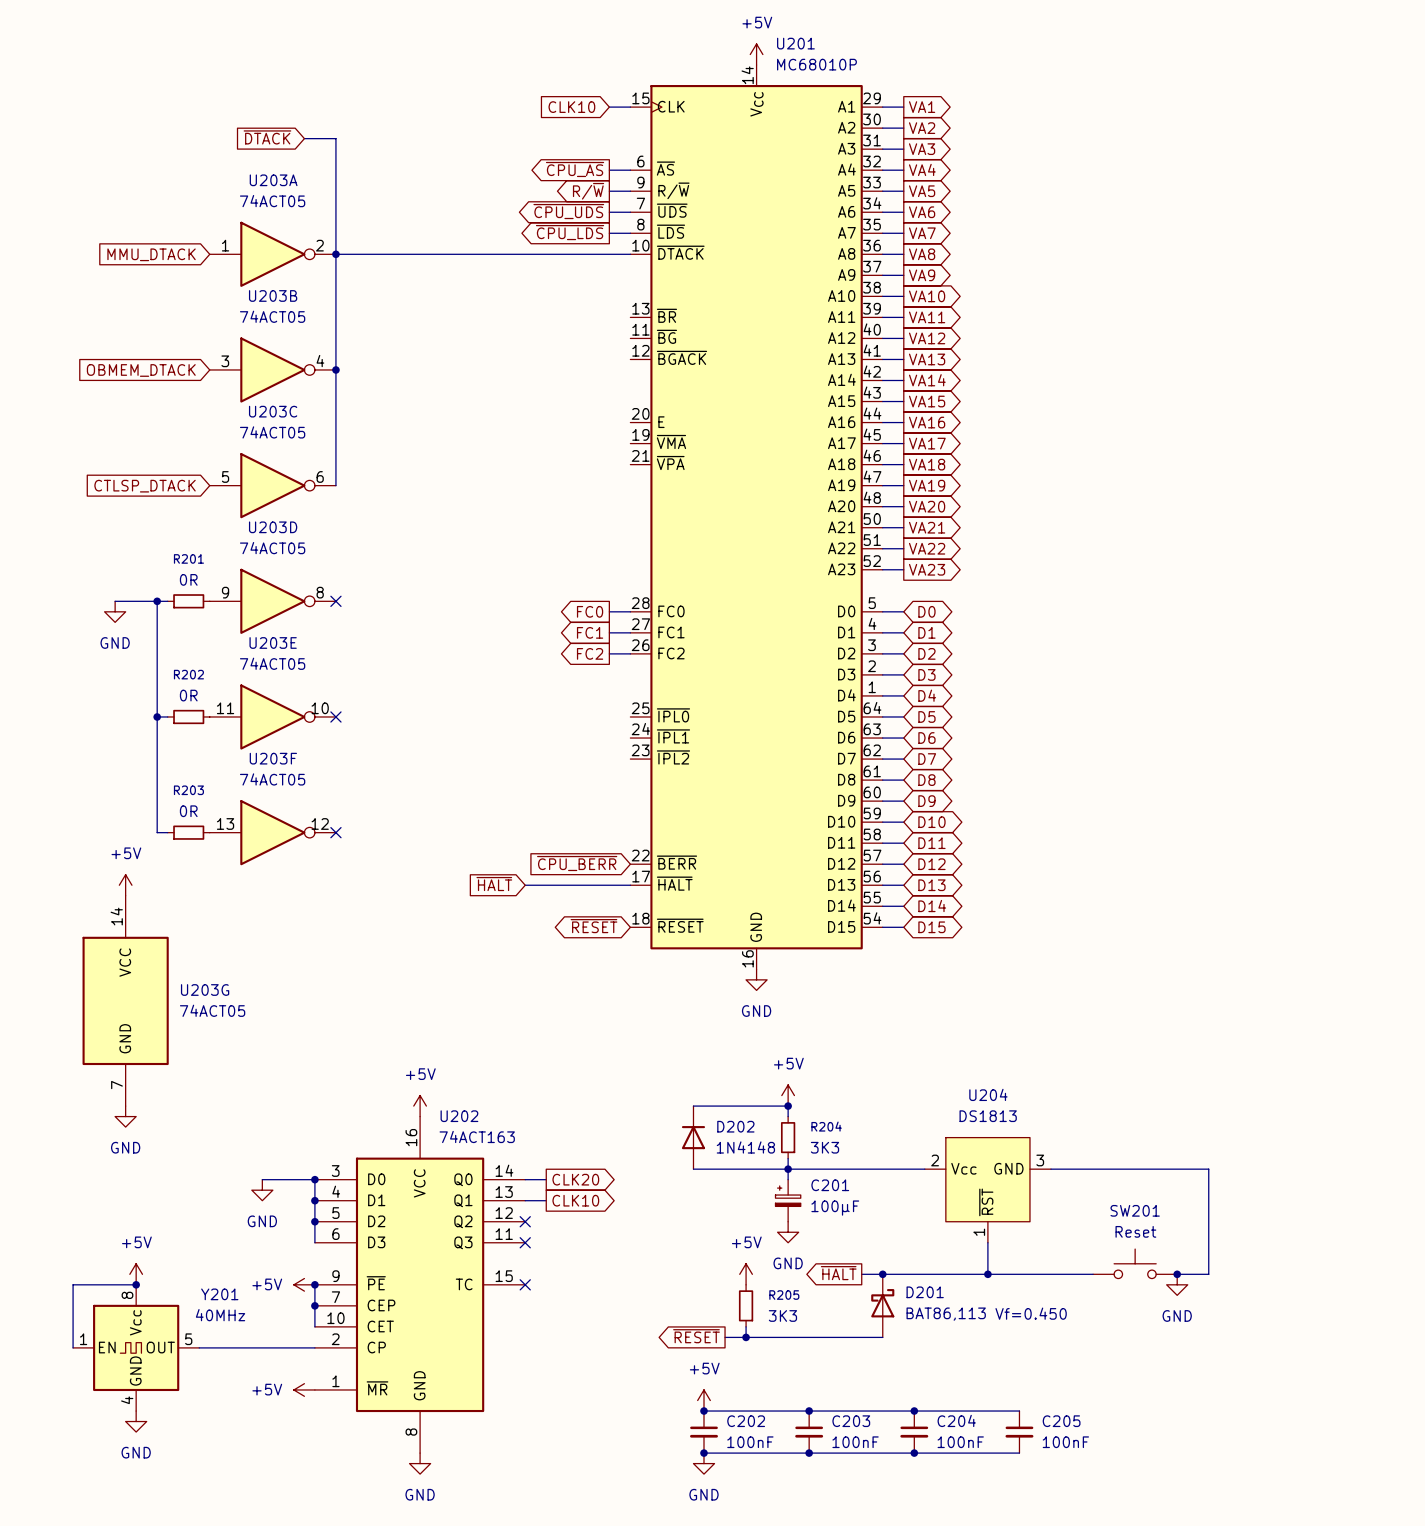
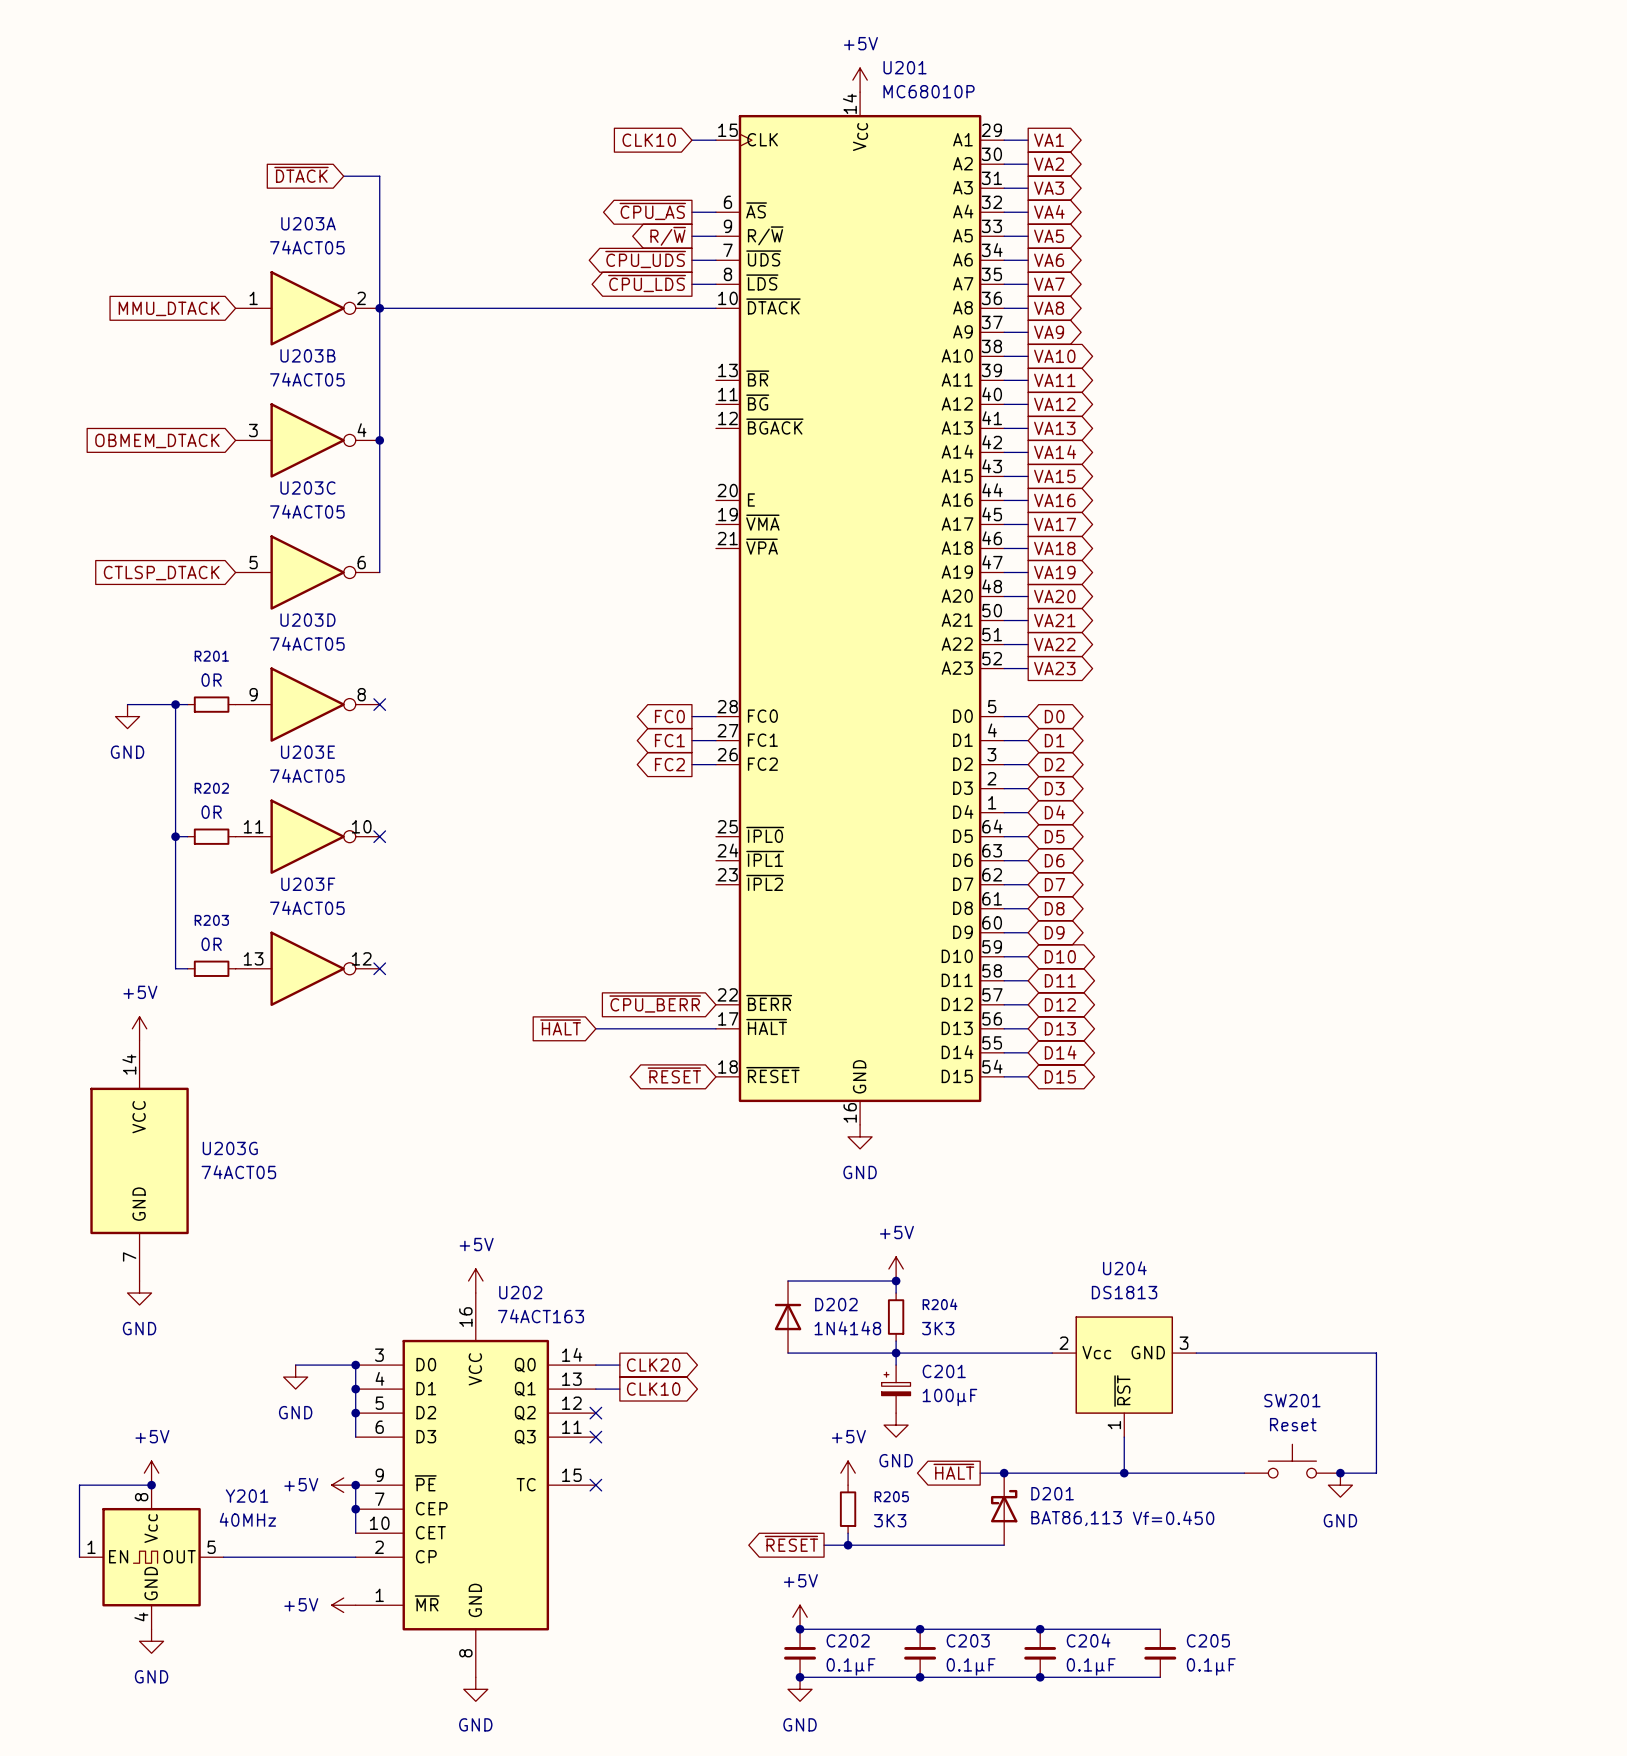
C202 value: 100nF (750, 1442) -> 0.1µF (851, 1666)
C203 value: 100nF (855, 1442) -> 0.1µF (971, 1666)
C204 value: 100nF (960, 1442) -> 0.1µF (1091, 1666)
C205 value: 100nF (1065, 1442) -> 0.1µF (1211, 1666)

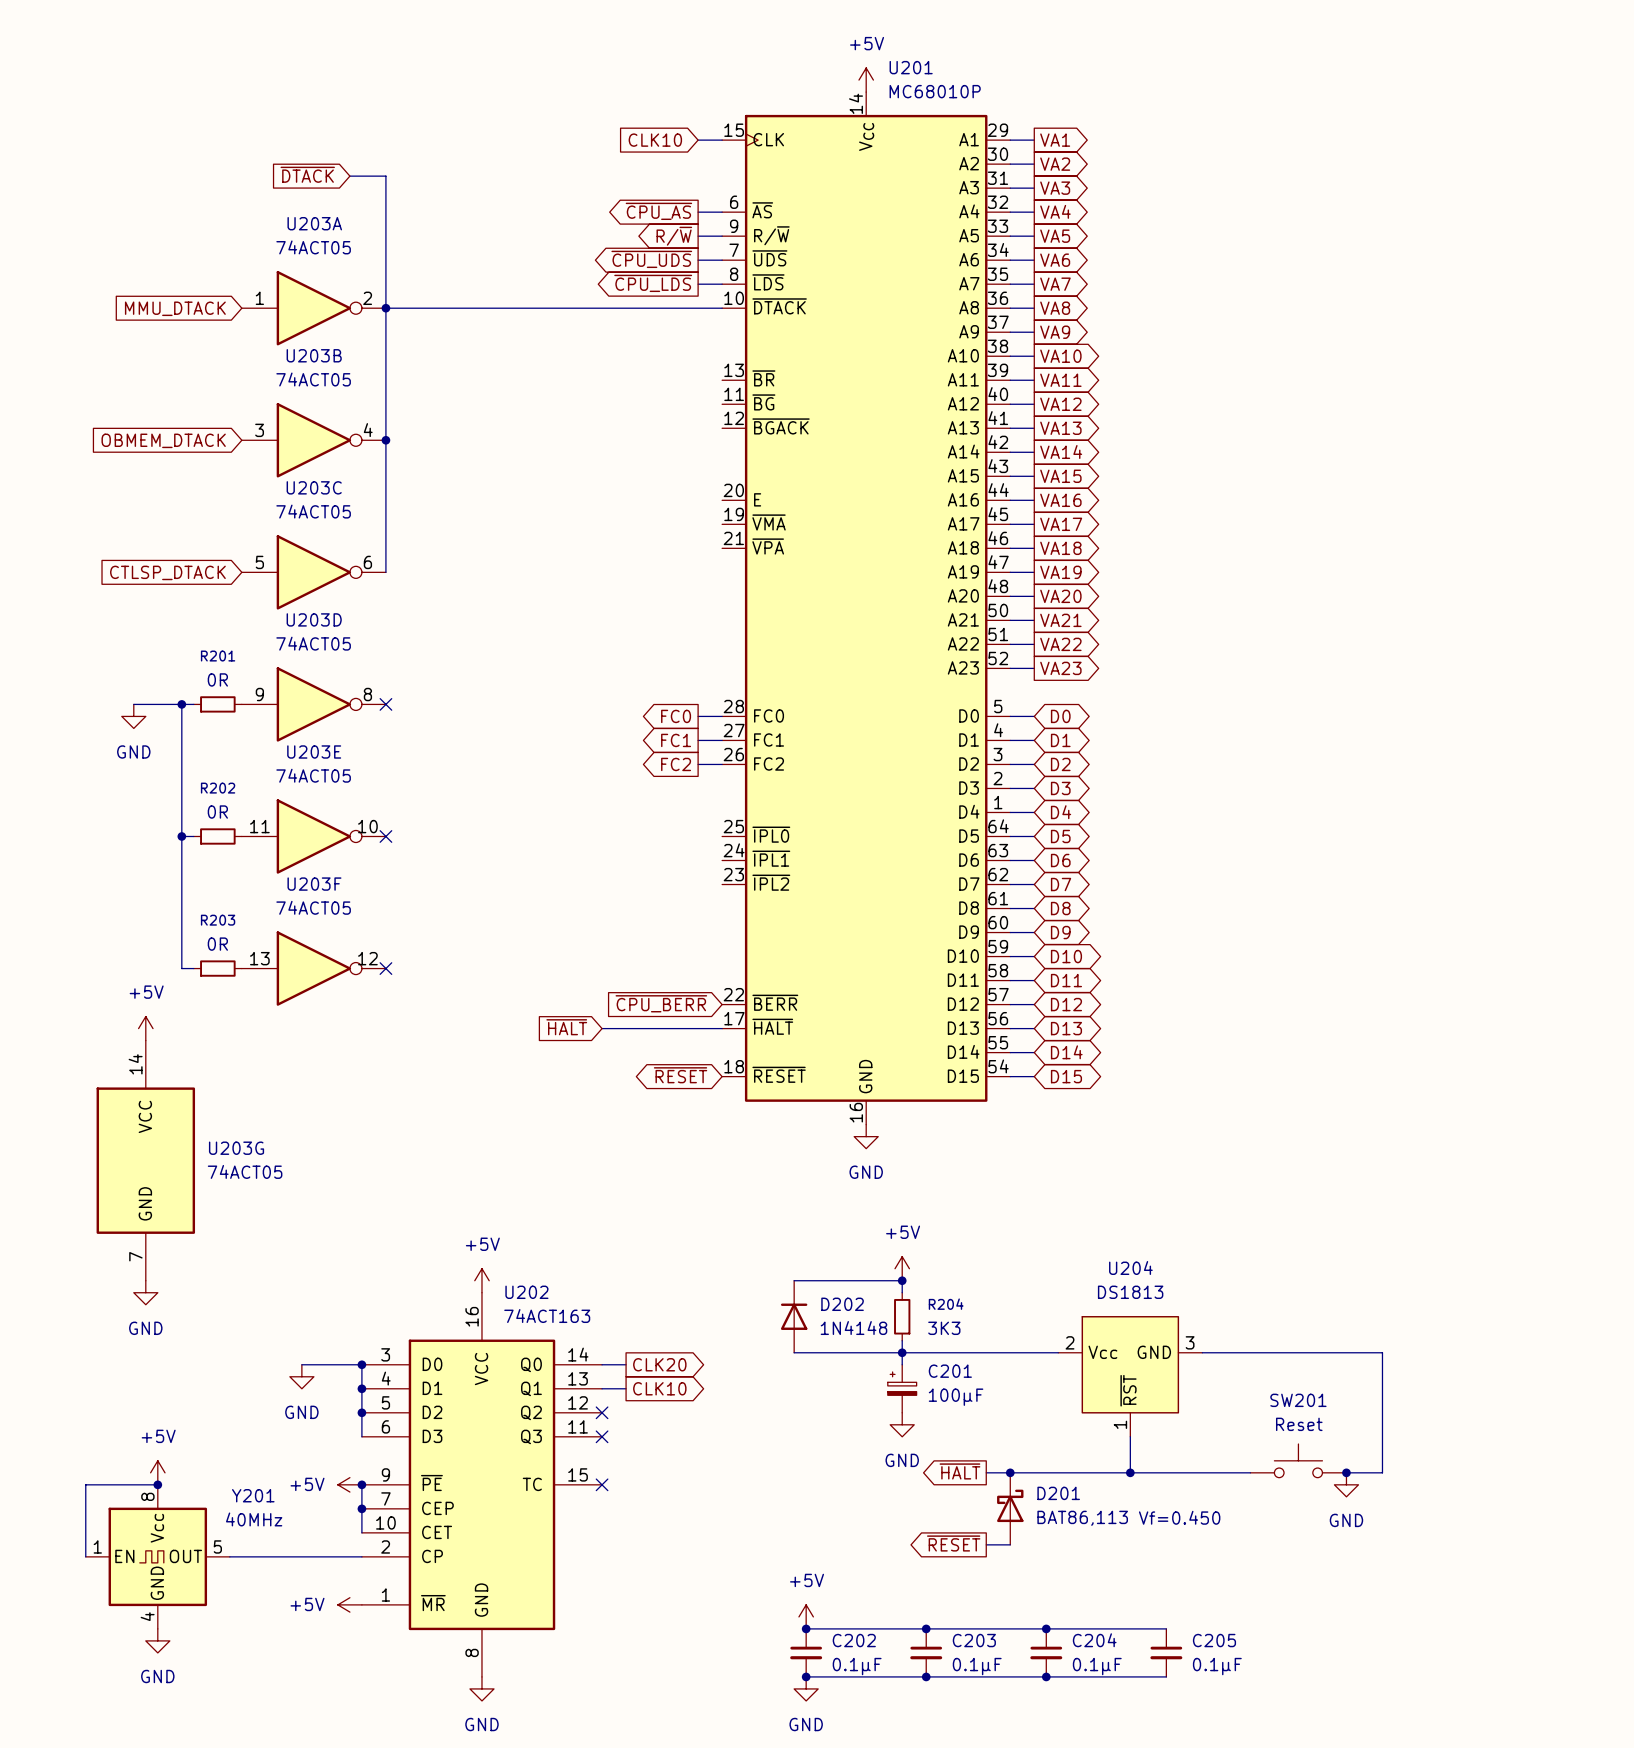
power symbol: +5V (848, 1473) -> none
R205: 3K3 (848, 1509) -> none
wire: (848, 1533) (848, 1545) -> none
global label position: ~{RESET} (791, 1543) -> ~{RESET} (953, 1543)
wire: (824, 1545) (980, 1545) -> none
junction: (848, 1545) -> none

